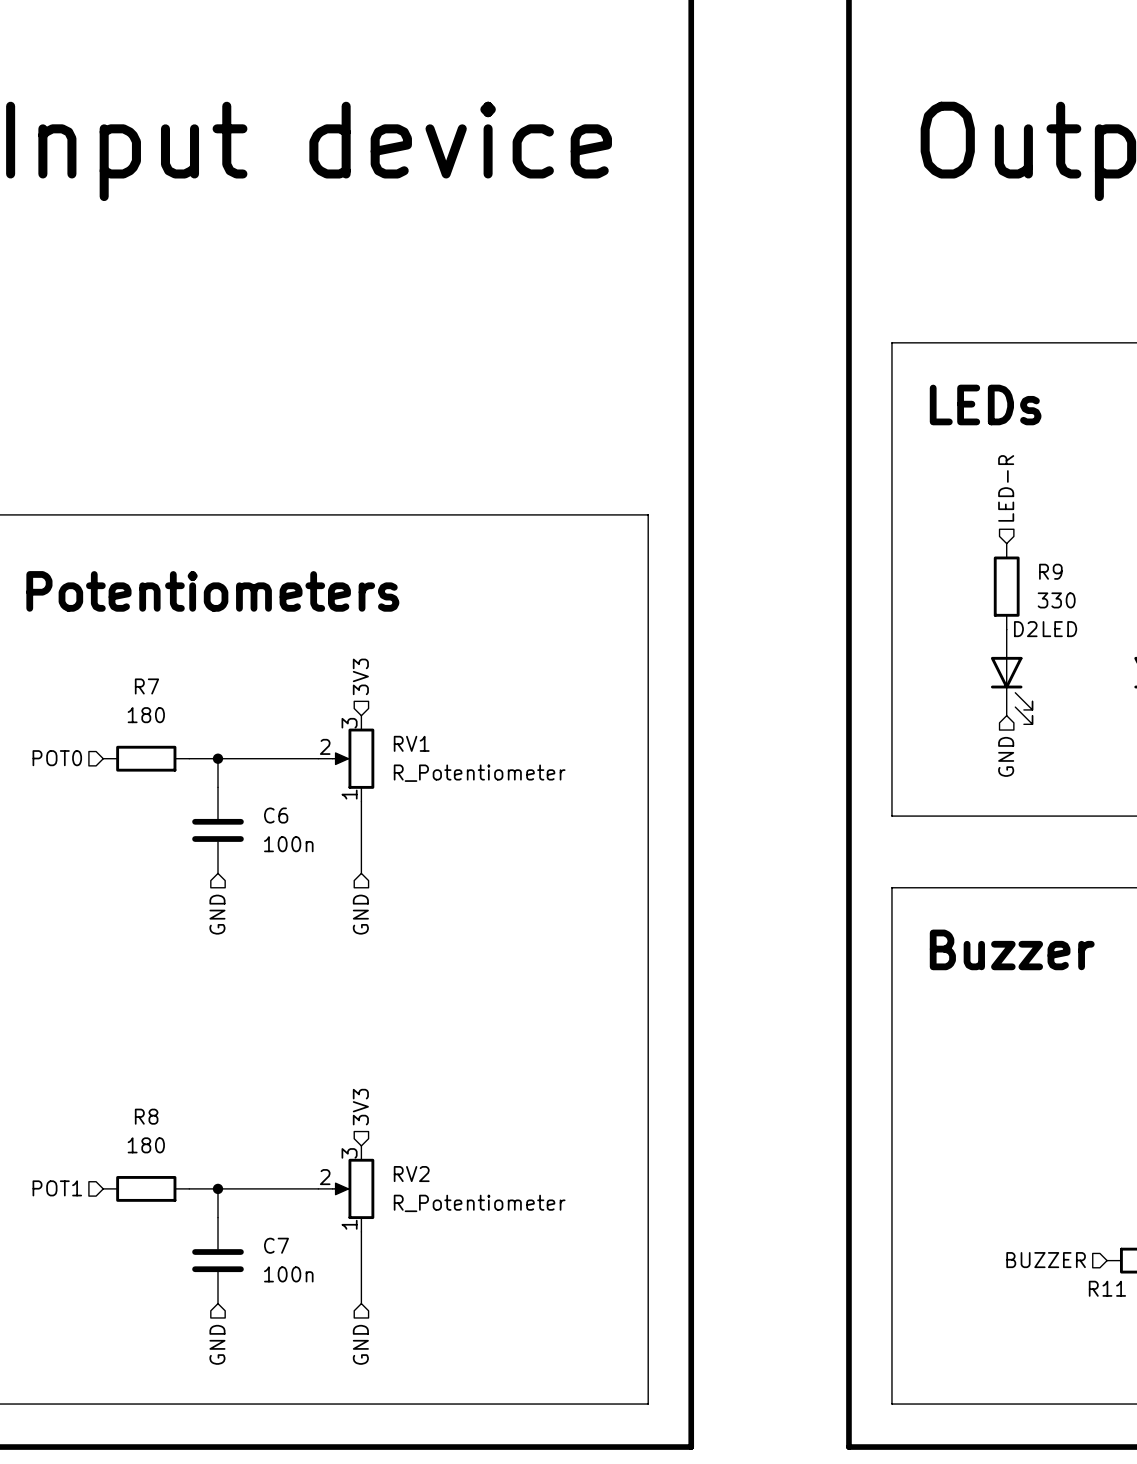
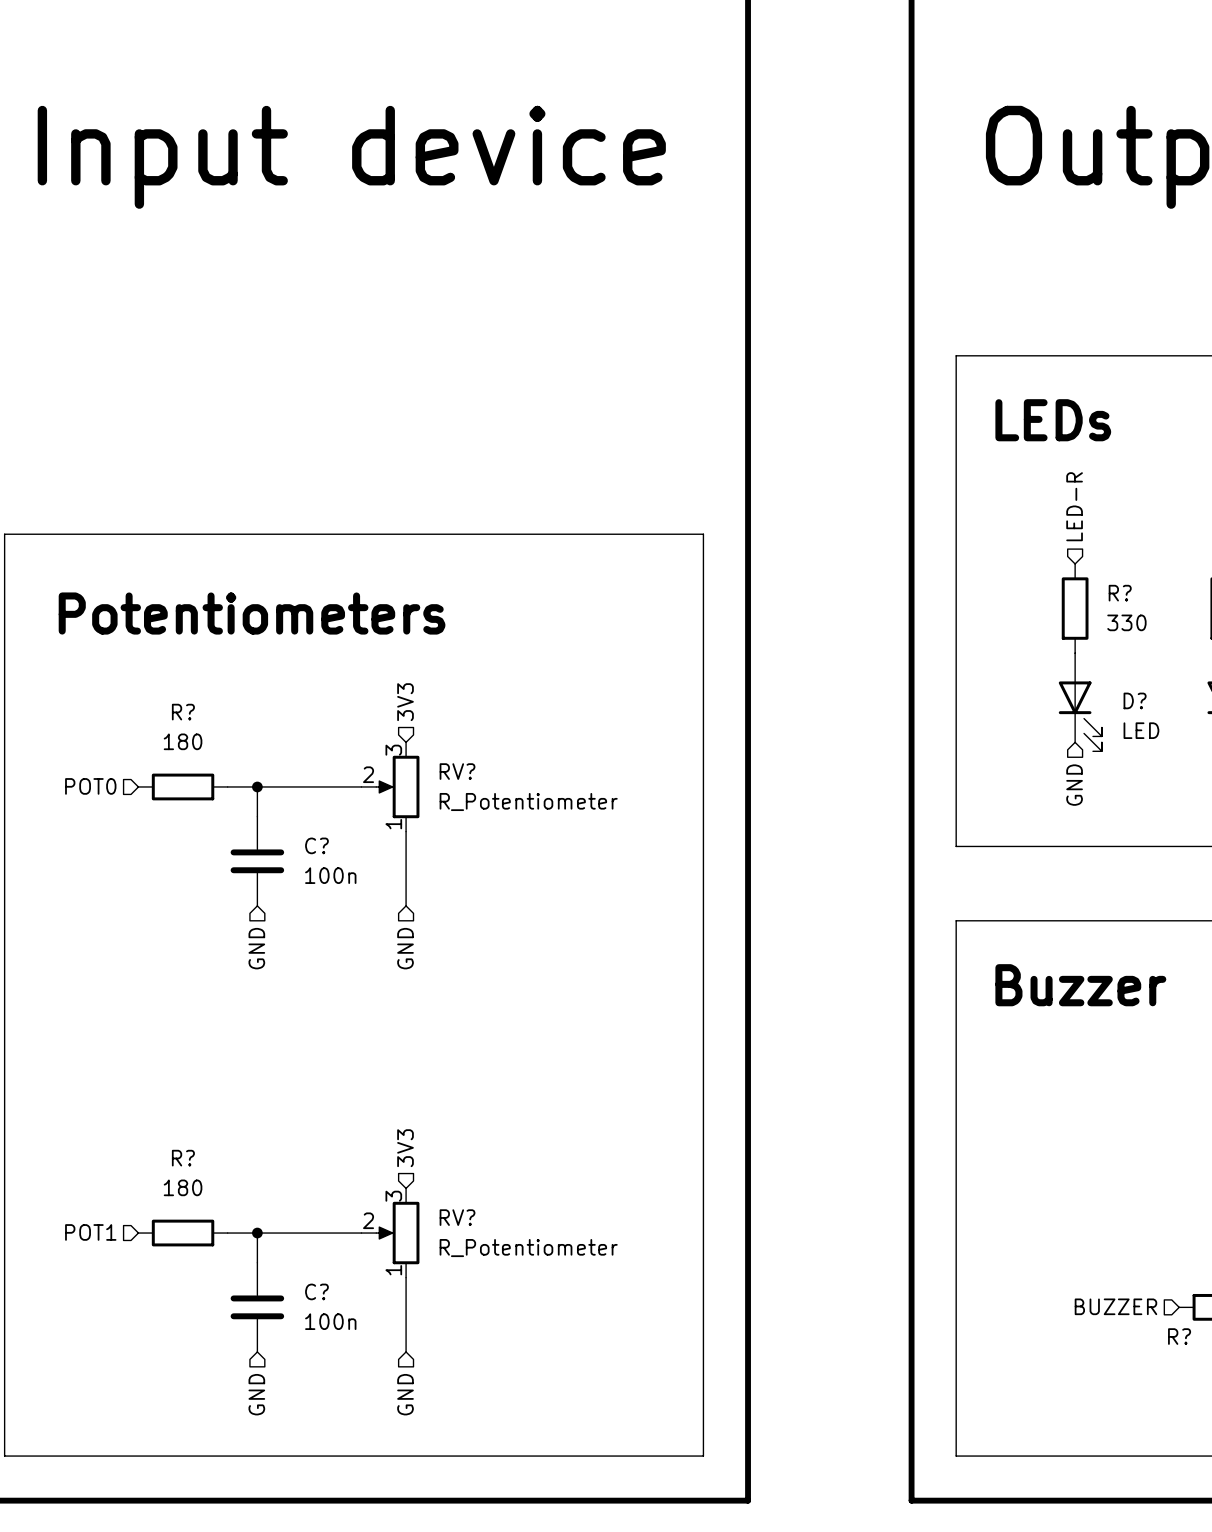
R9 name: R9 (1050, 571) -> R? (1120, 593)
D2 name: D2 (1025, 629) -> D? (1135, 700)
D2 value position: LED (1059, 629) -> LED (1141, 730)
R7 name: R7 (146, 686) -> R? (183, 712)
RV1 name: RV1 (411, 743) -> RV? (457, 771)
C6 name: C6 (276, 815) -> C? (316, 845)
R8 name: R8 (146, 1116) -> R? (183, 1158)
RV2 name: RV2 (411, 1174) -> RV? (457, 1217)
C7 name: C7 (276, 1245) -> C? (316, 1291)
R11 name: R11 (1107, 1288) -> R? (1179, 1336)

